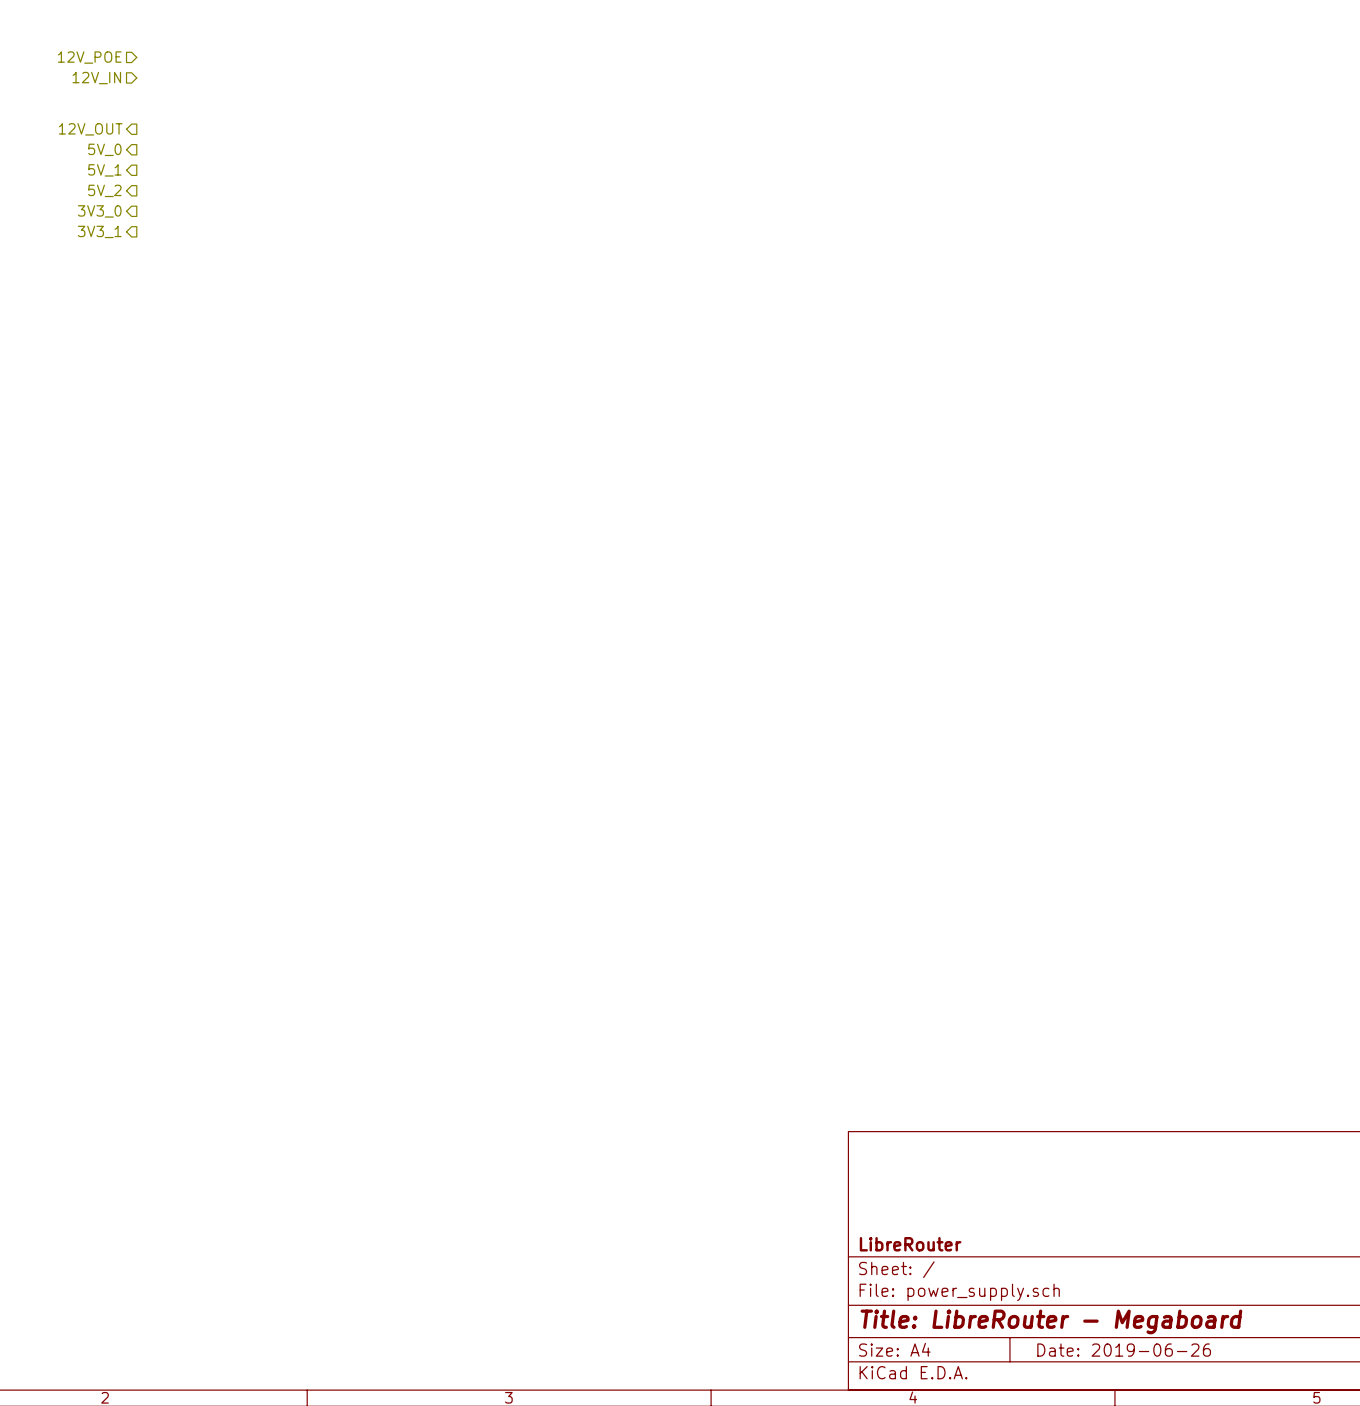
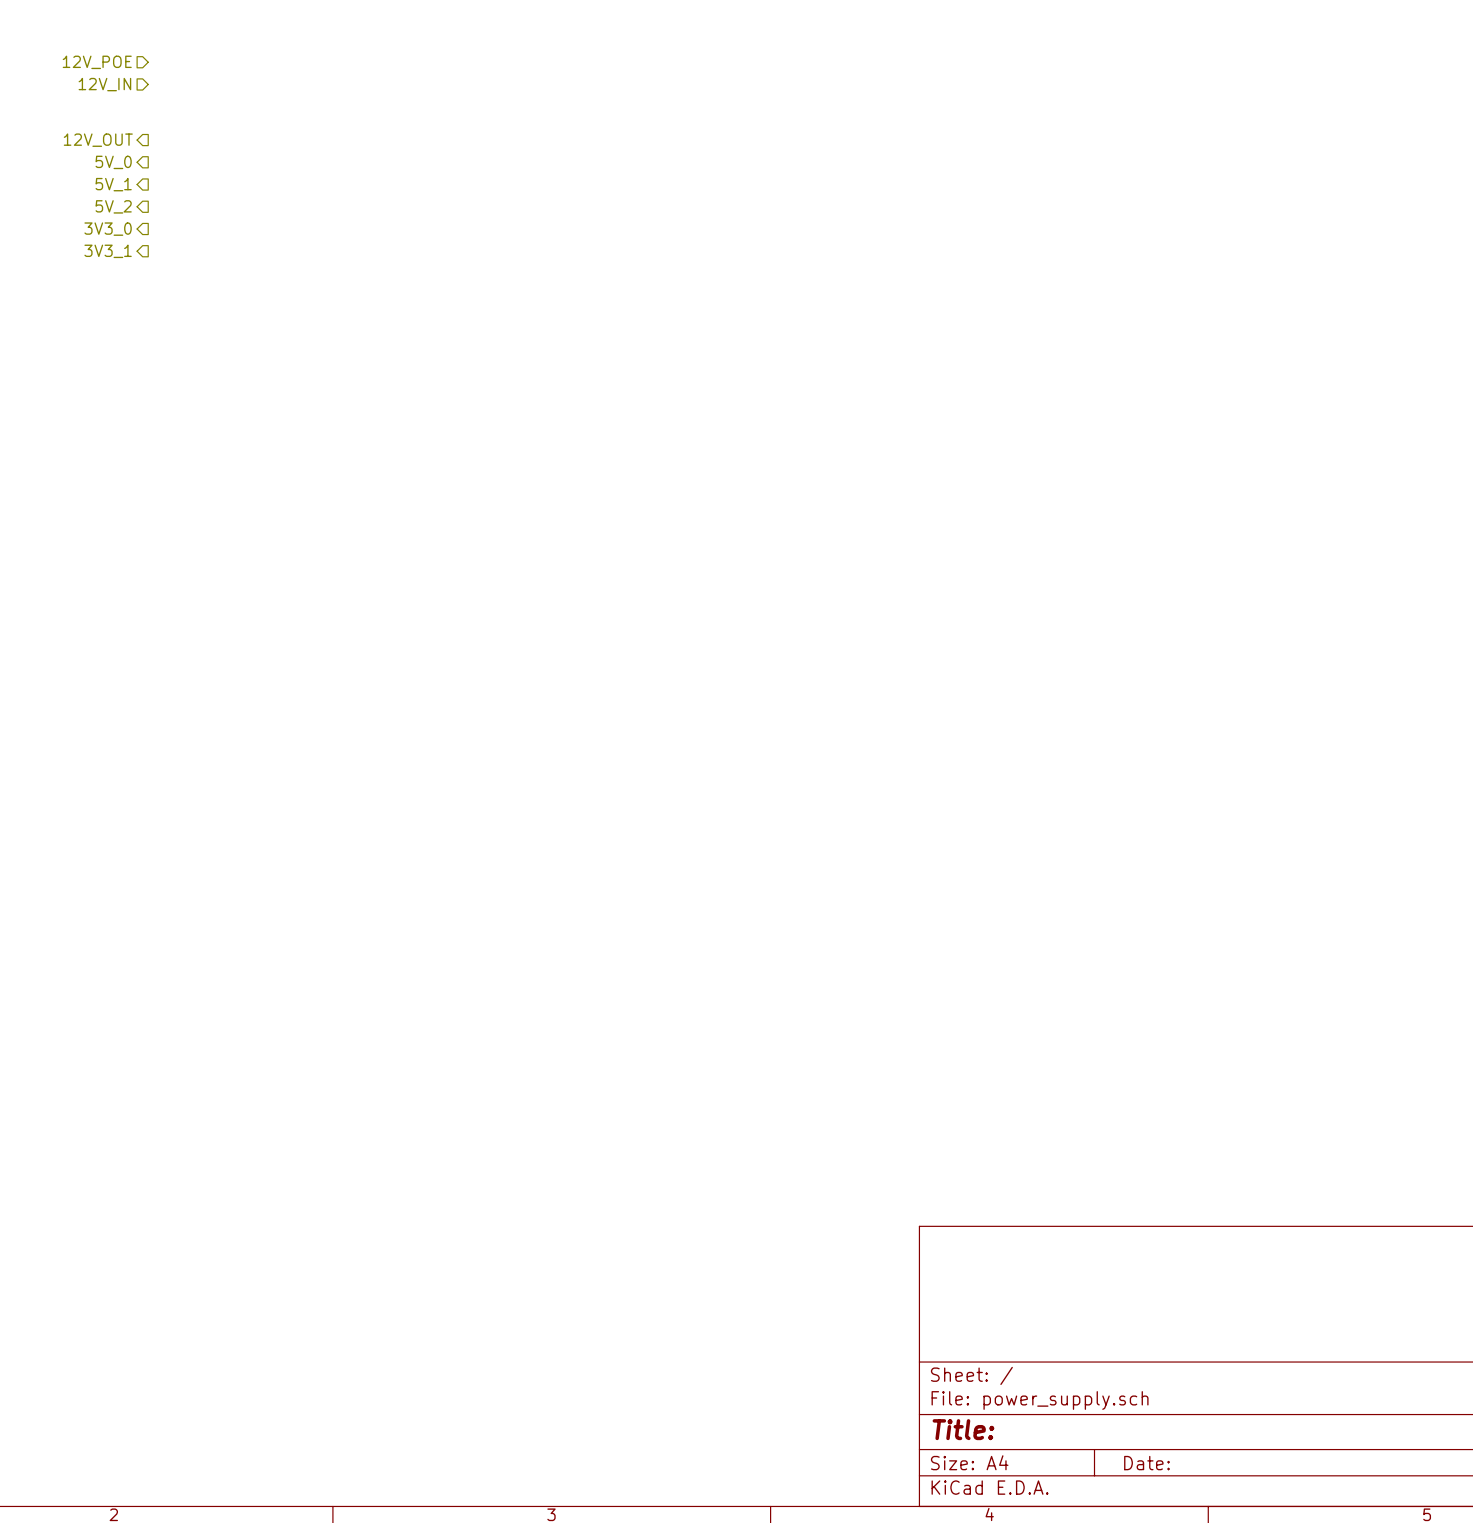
title block: LibreRouter (910, 1244) -> none
title block: Title: LibreRouter - Megaboard (1051, 1321) -> Title: (963, 1429)
title block: Date: 2019-06-26 (1124, 1350) -> Date: (1146, 1463)

